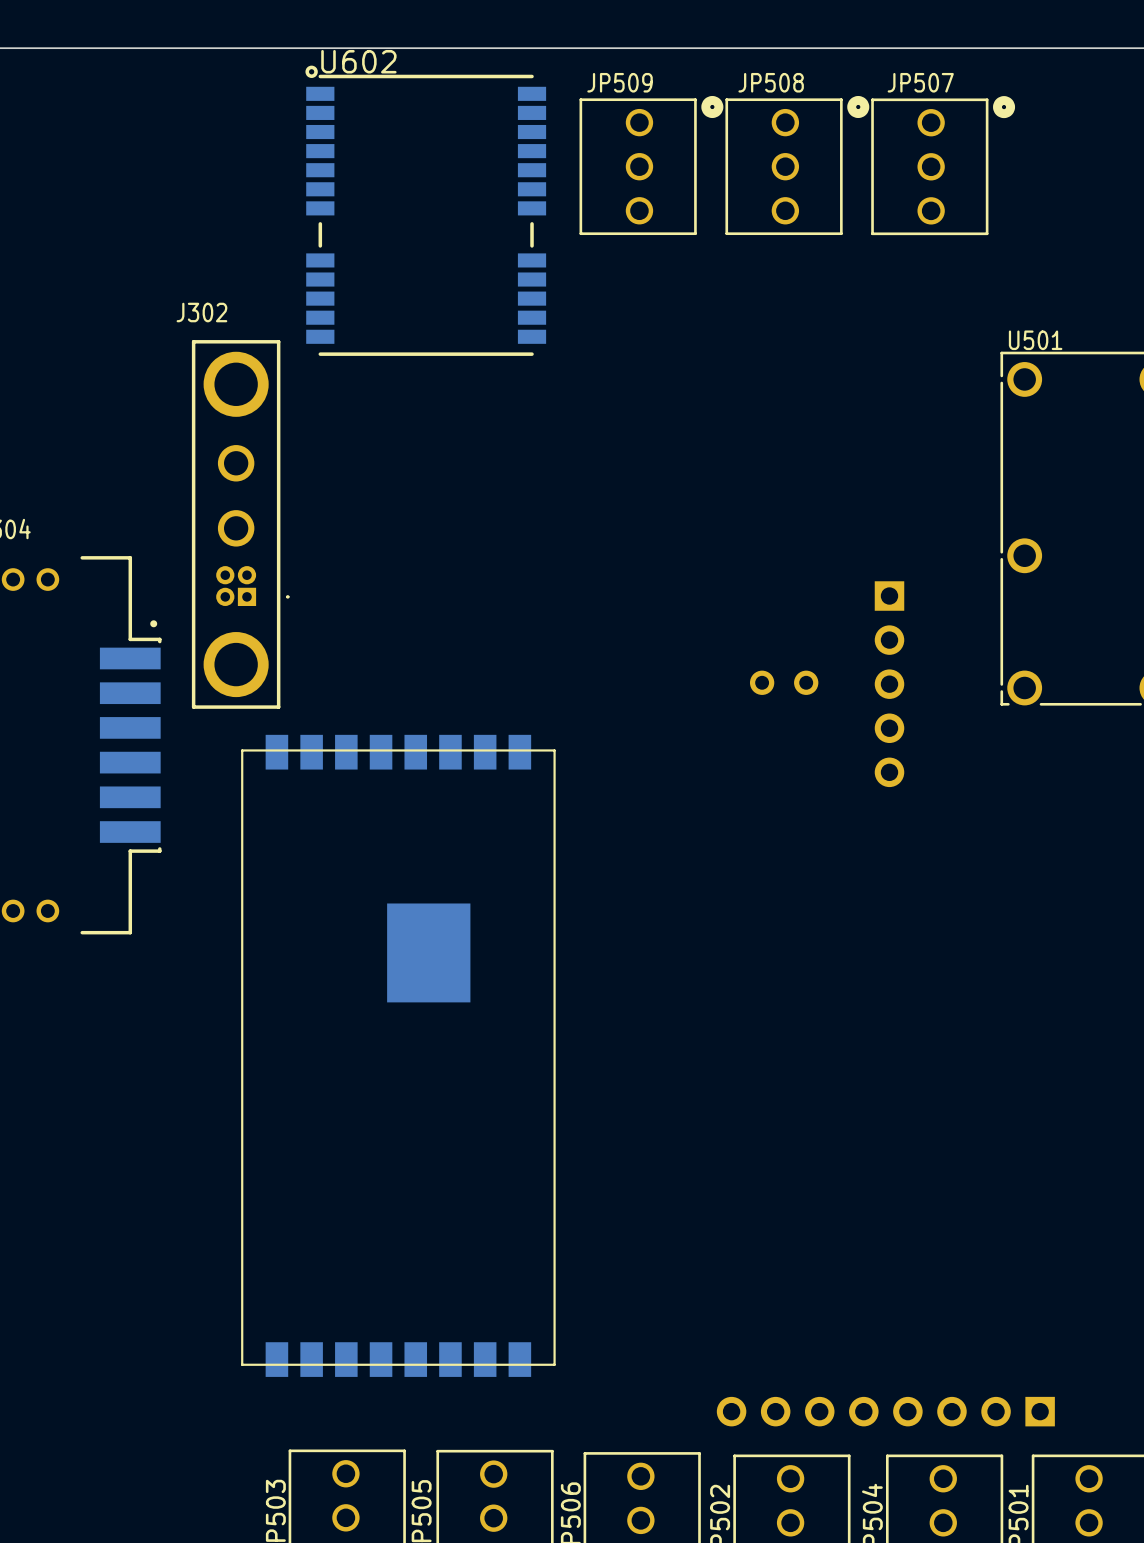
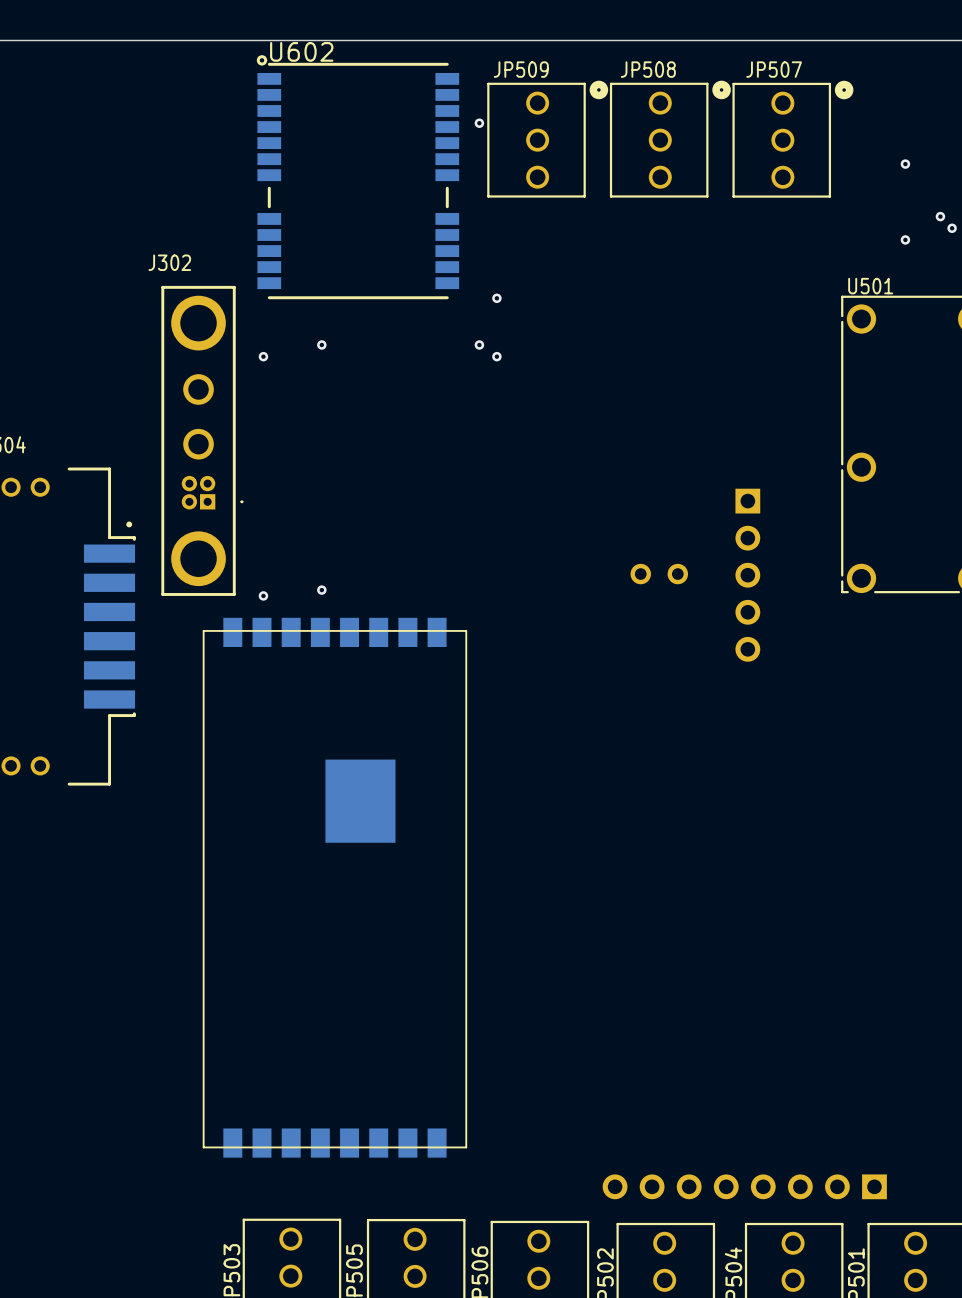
via: none -> (479, 123)
via: none -> (905, 164)
via: none -> (940, 216)
via: none -> (952, 228)
via: none -> (905, 239)
via: none -> (496, 298)
via: none -> (321, 344)
via: none -> (479, 344)
via: none -> (263, 356)
via: none -> (496, 356)
via: none -> (321, 590)
via: none -> (263, 595)

